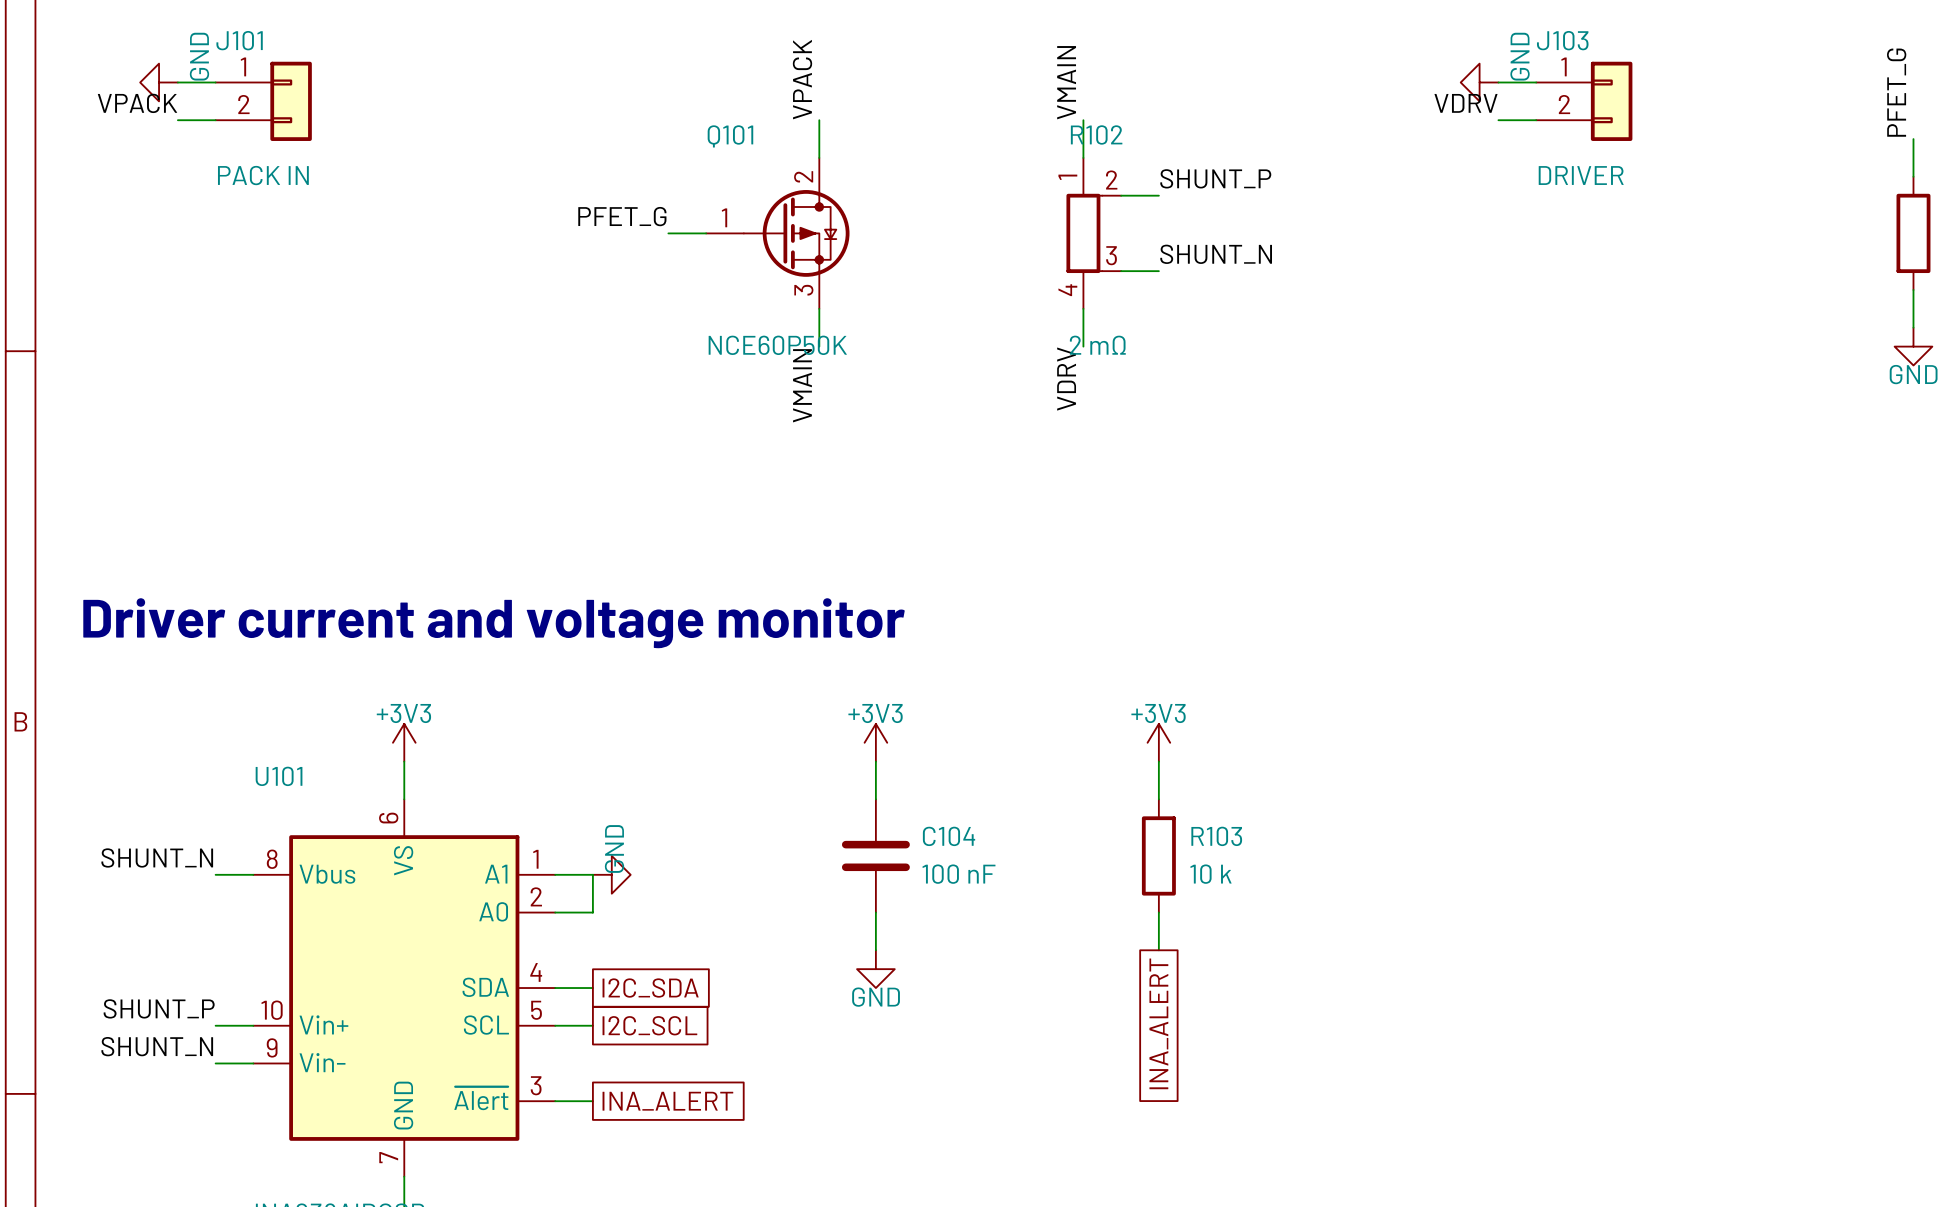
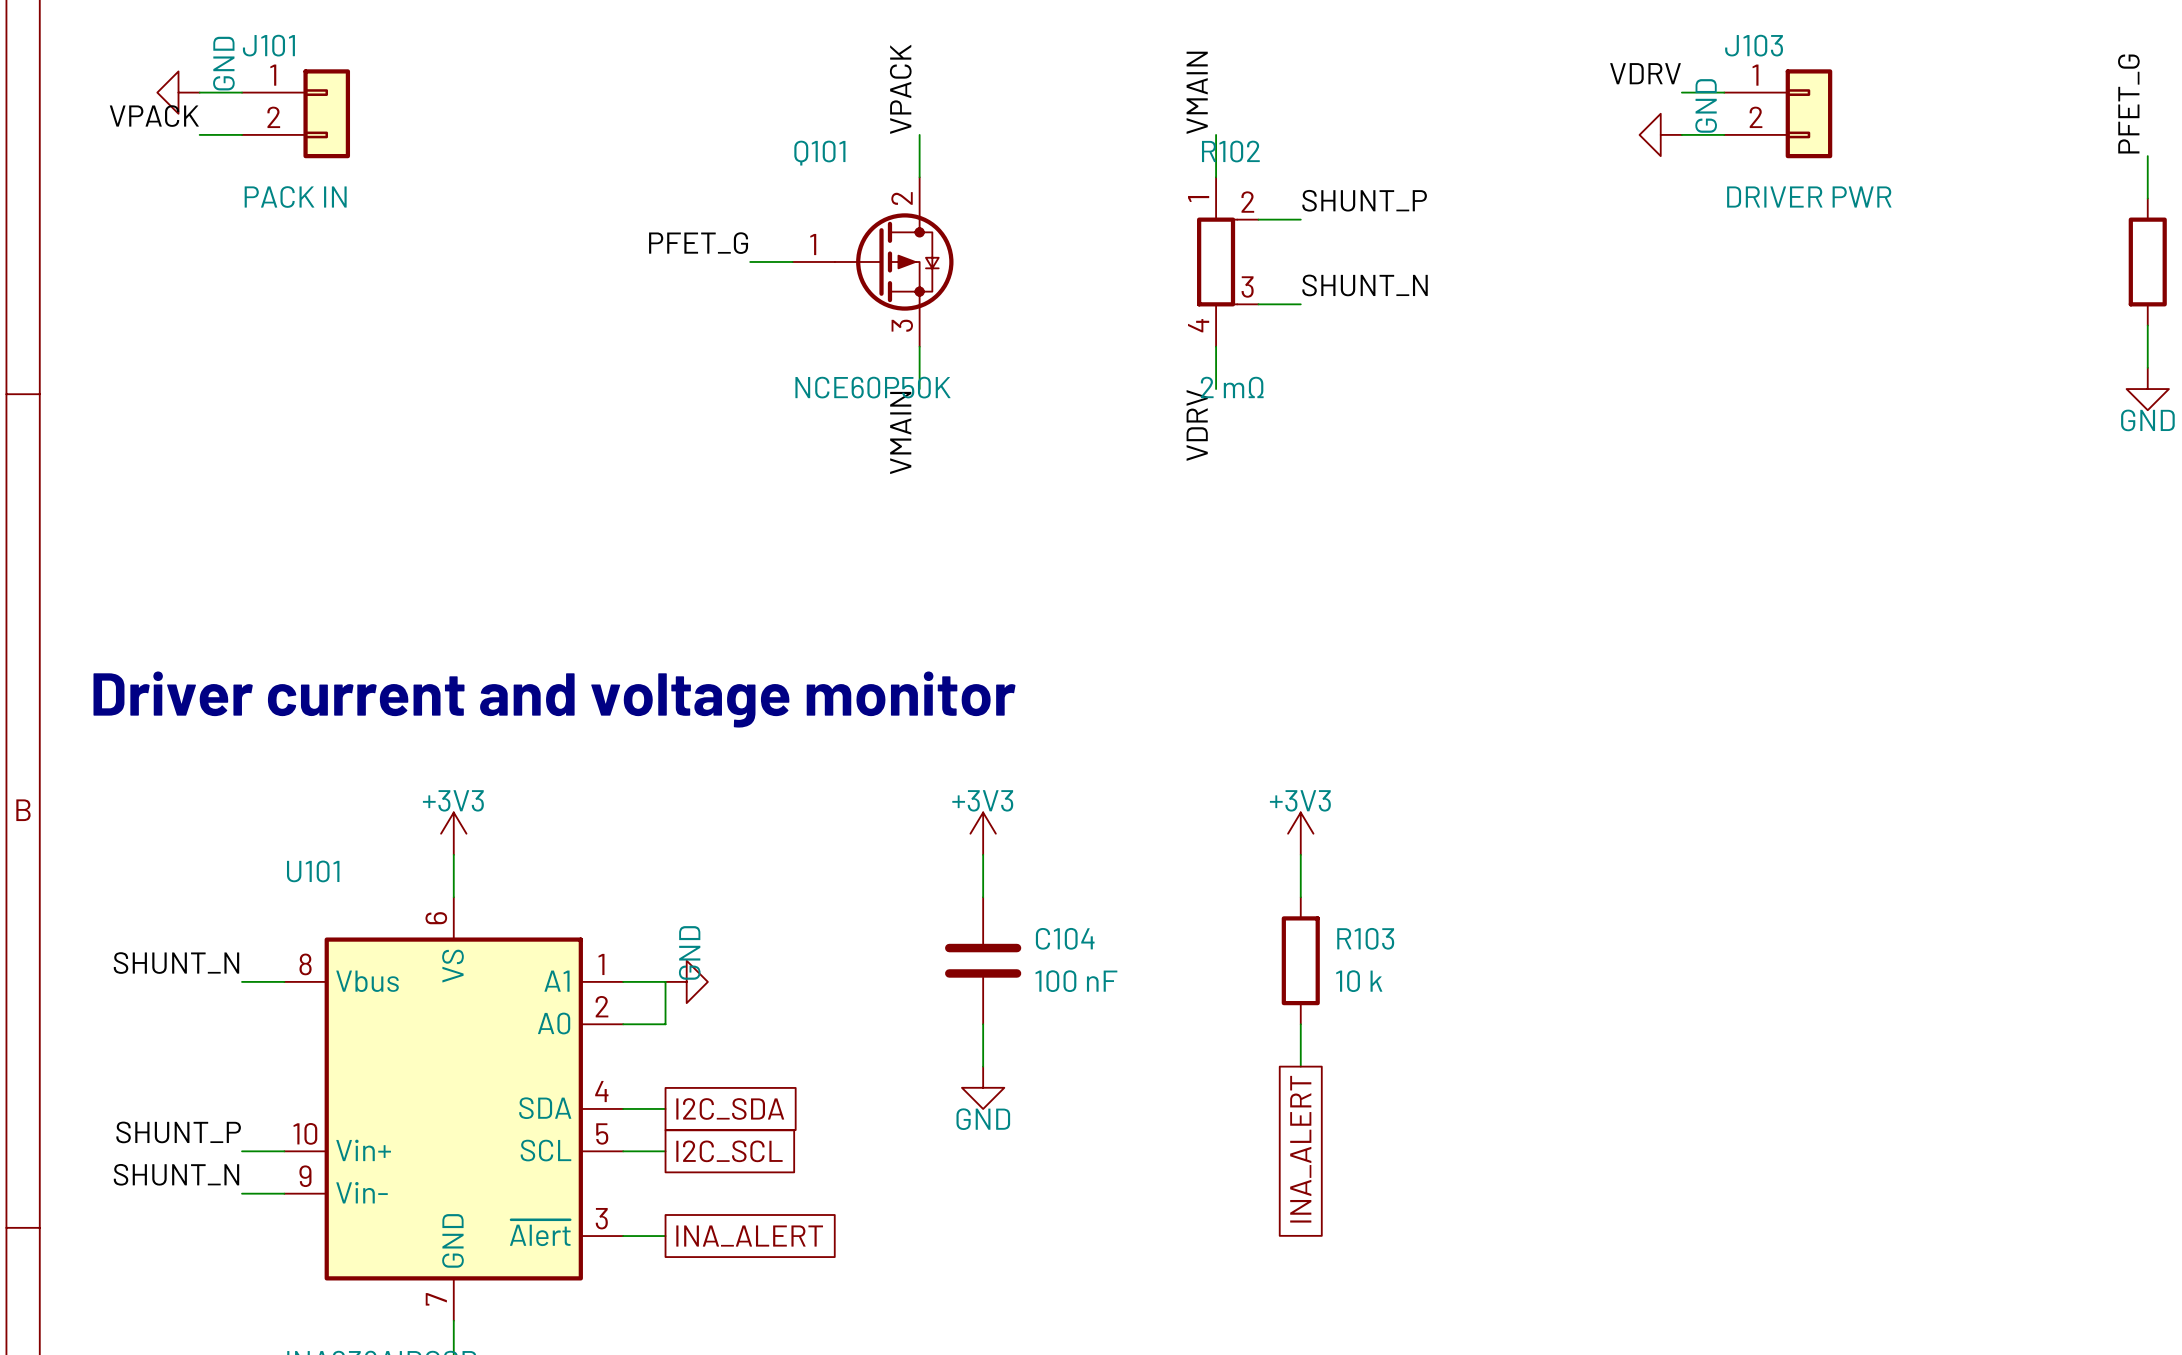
power symbol position: GND (1479, 82) -> GND (1660, 134)
label position: VDRV (1466, 103) -> VDRV (1645, 73)
J103 value: DRIVER (1581, 175) -> DRIVER PWR (1809, 196)

